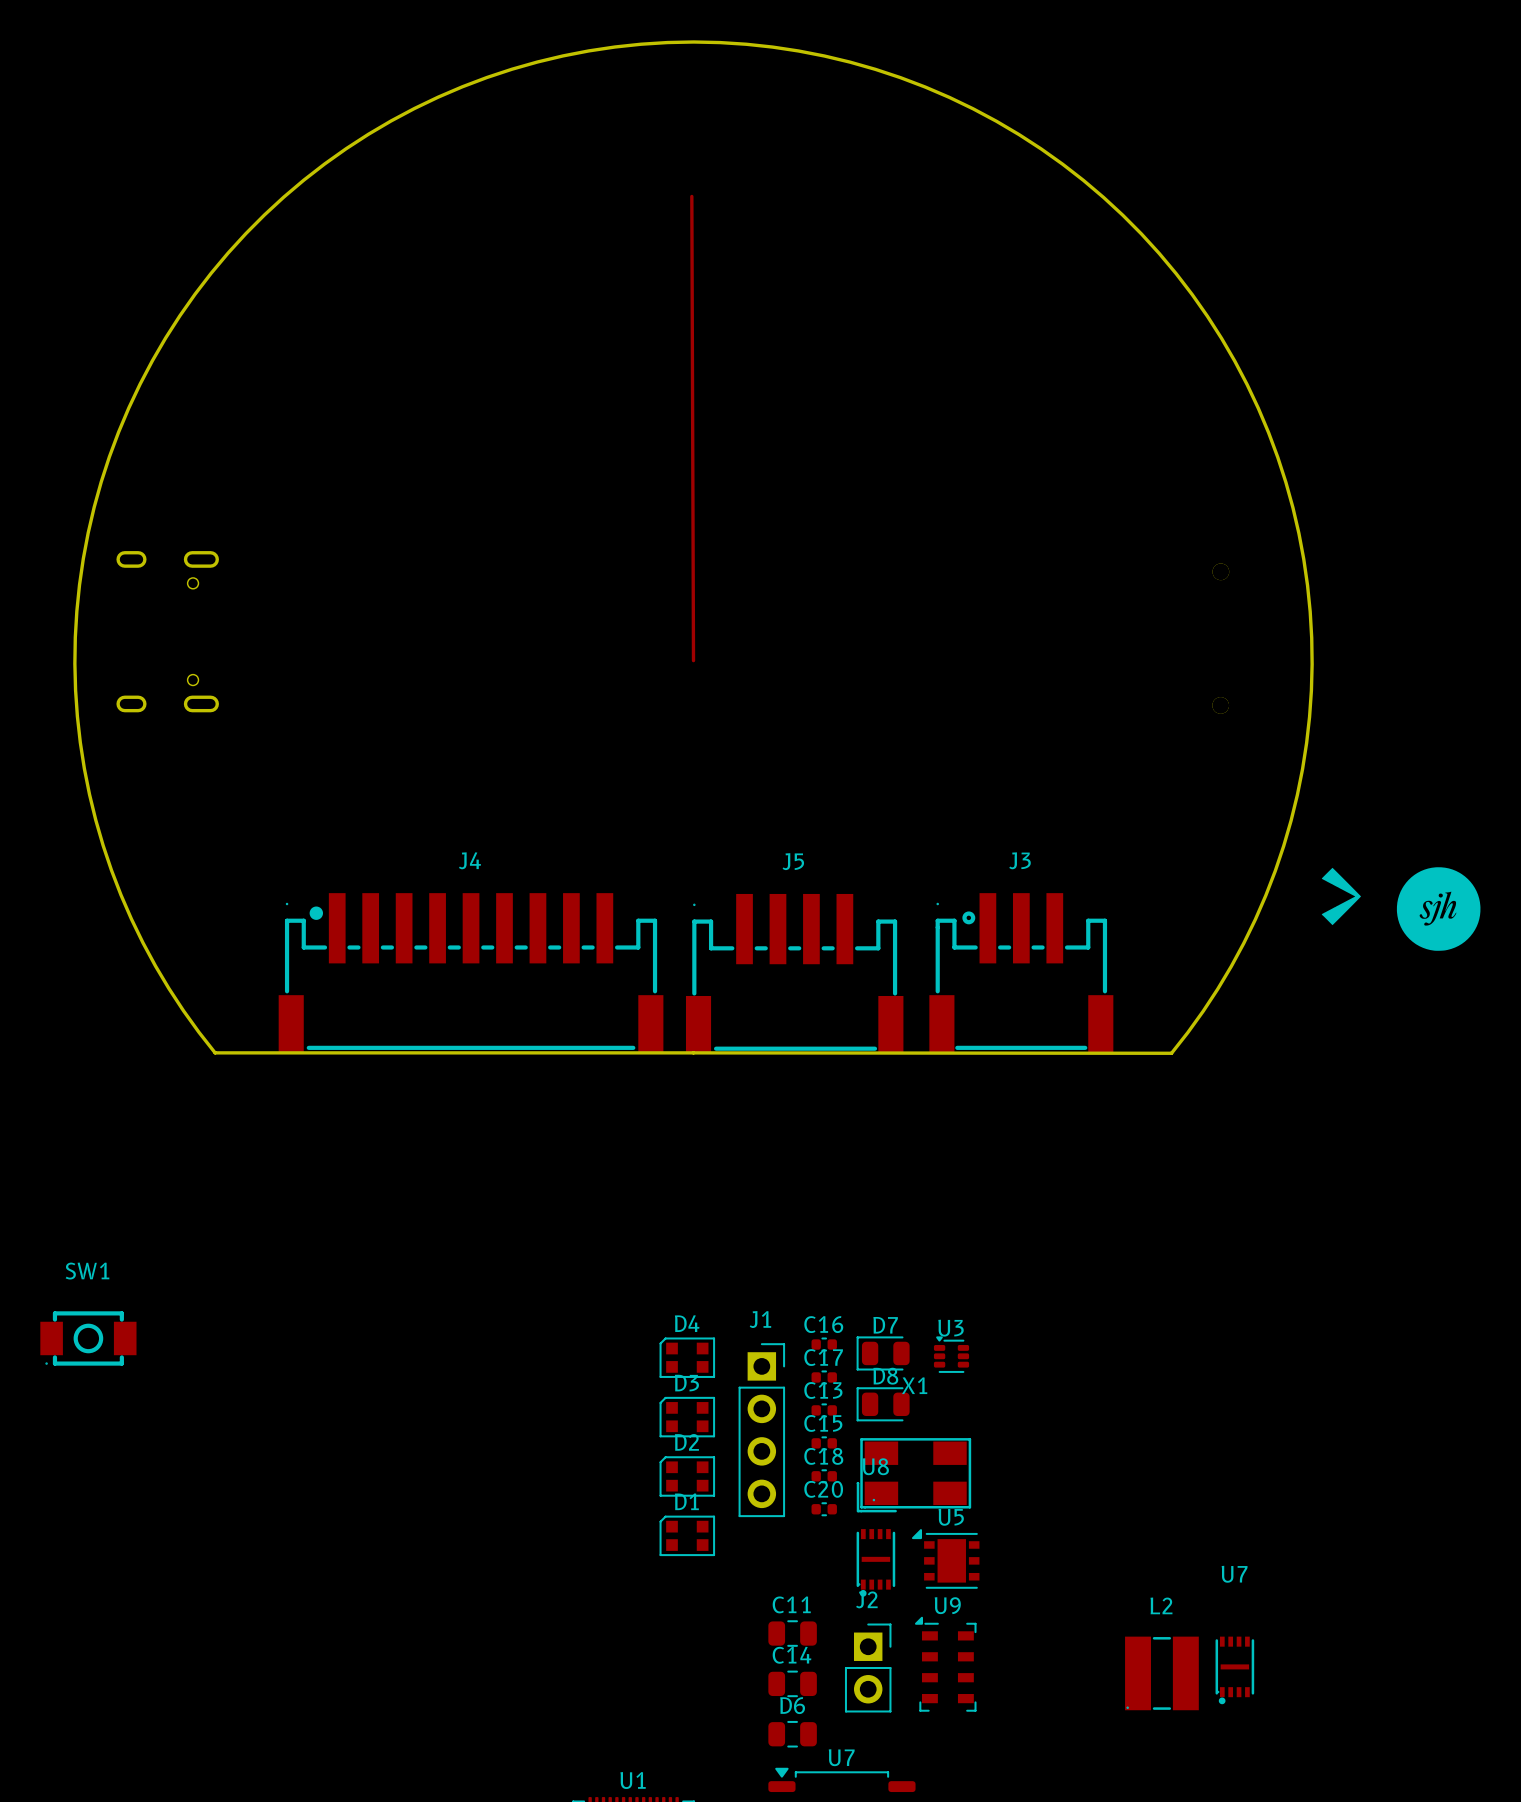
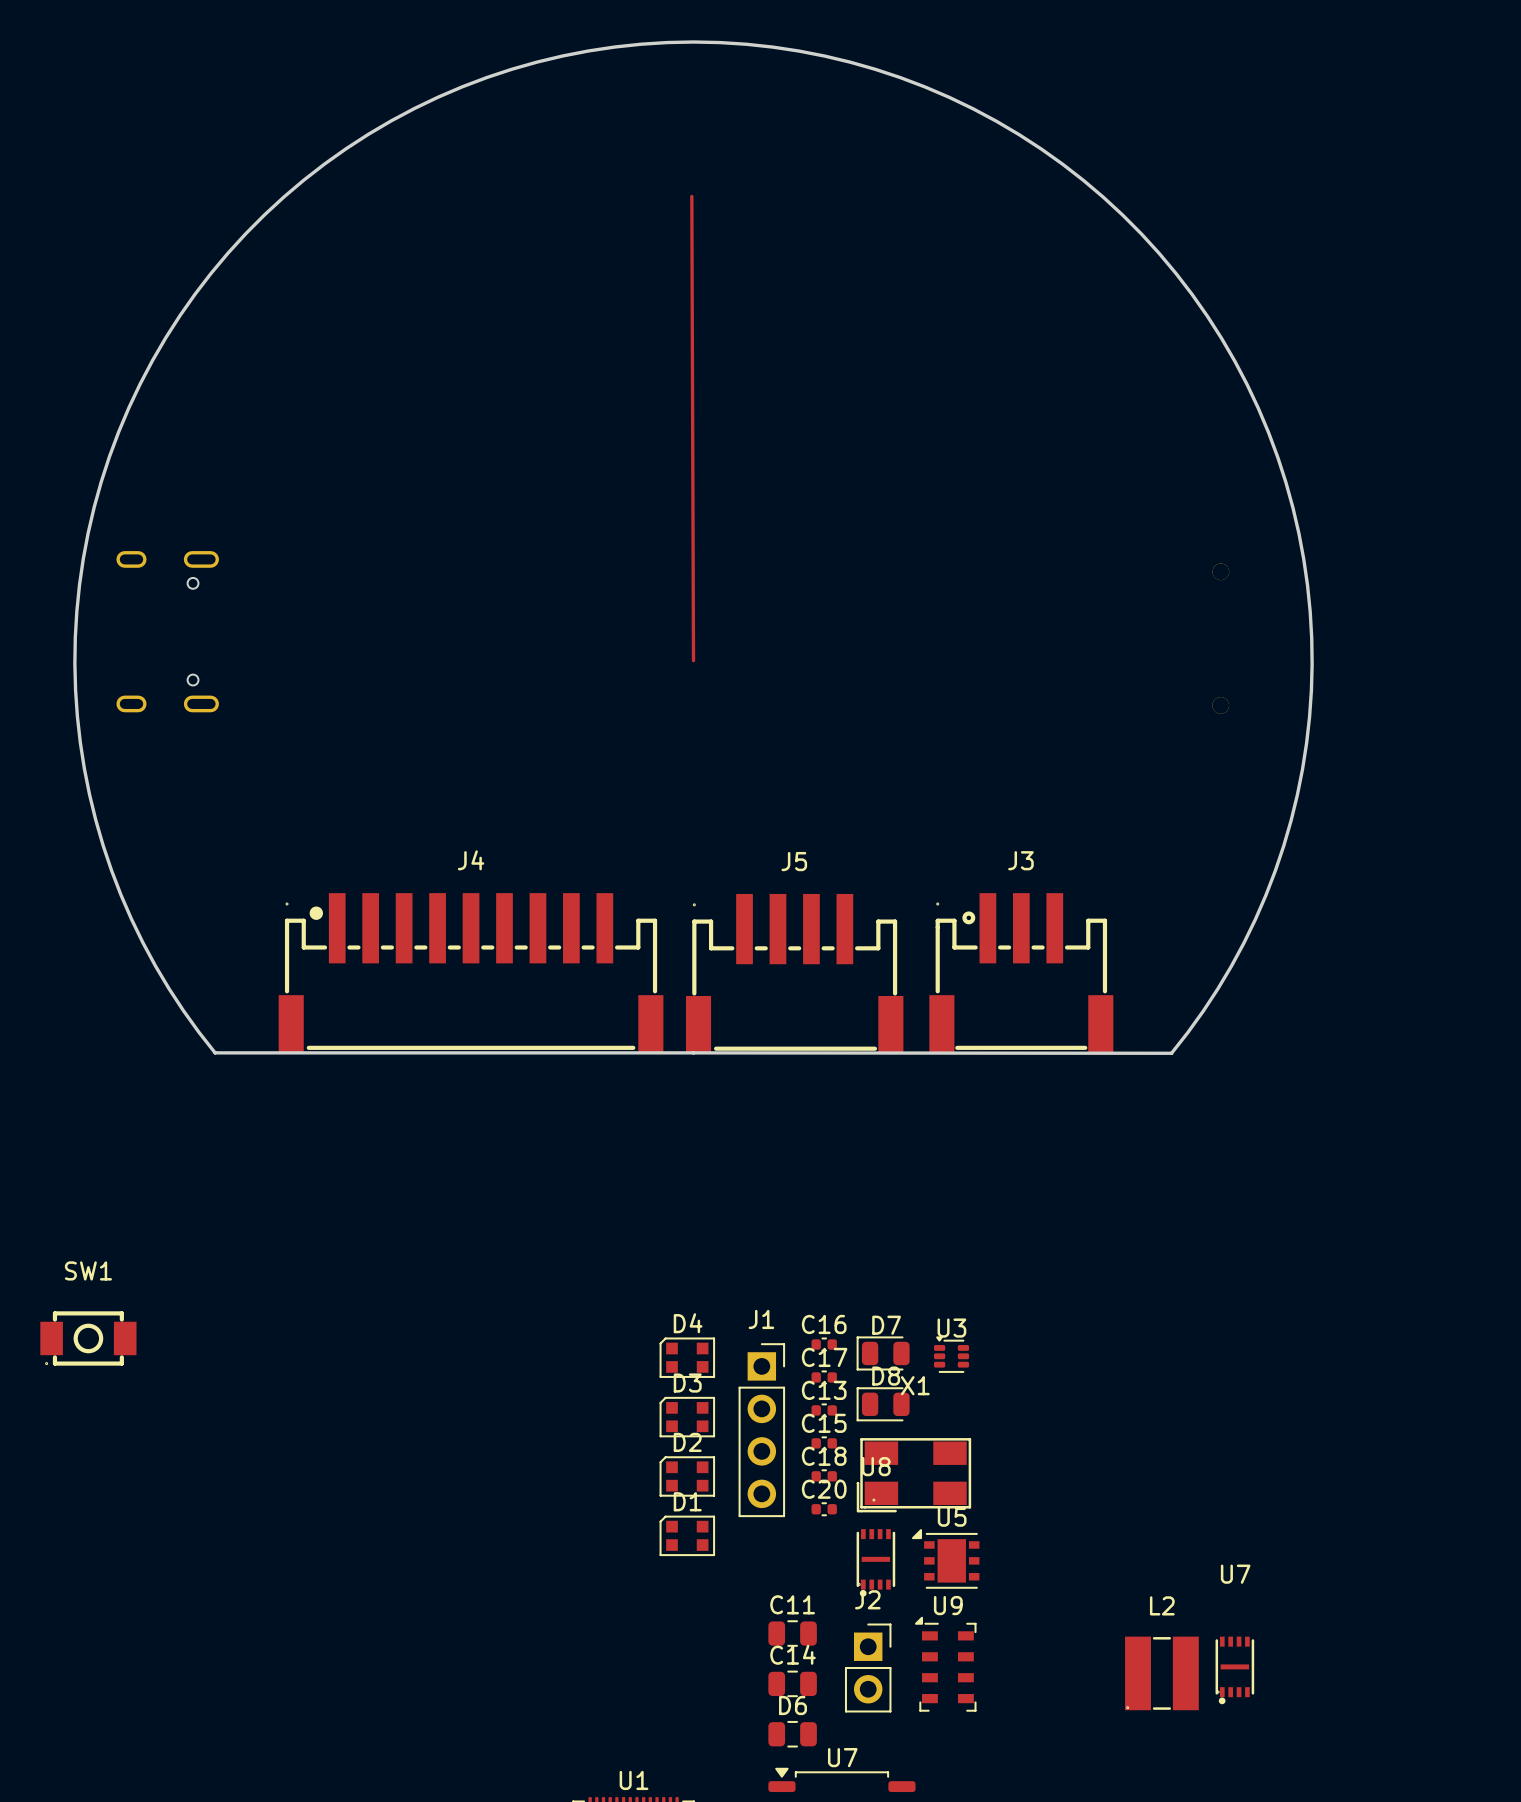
drawing: [1321, 867, 1362, 926] -> none
drawing: [1396, 867, 1481, 951] -> none

